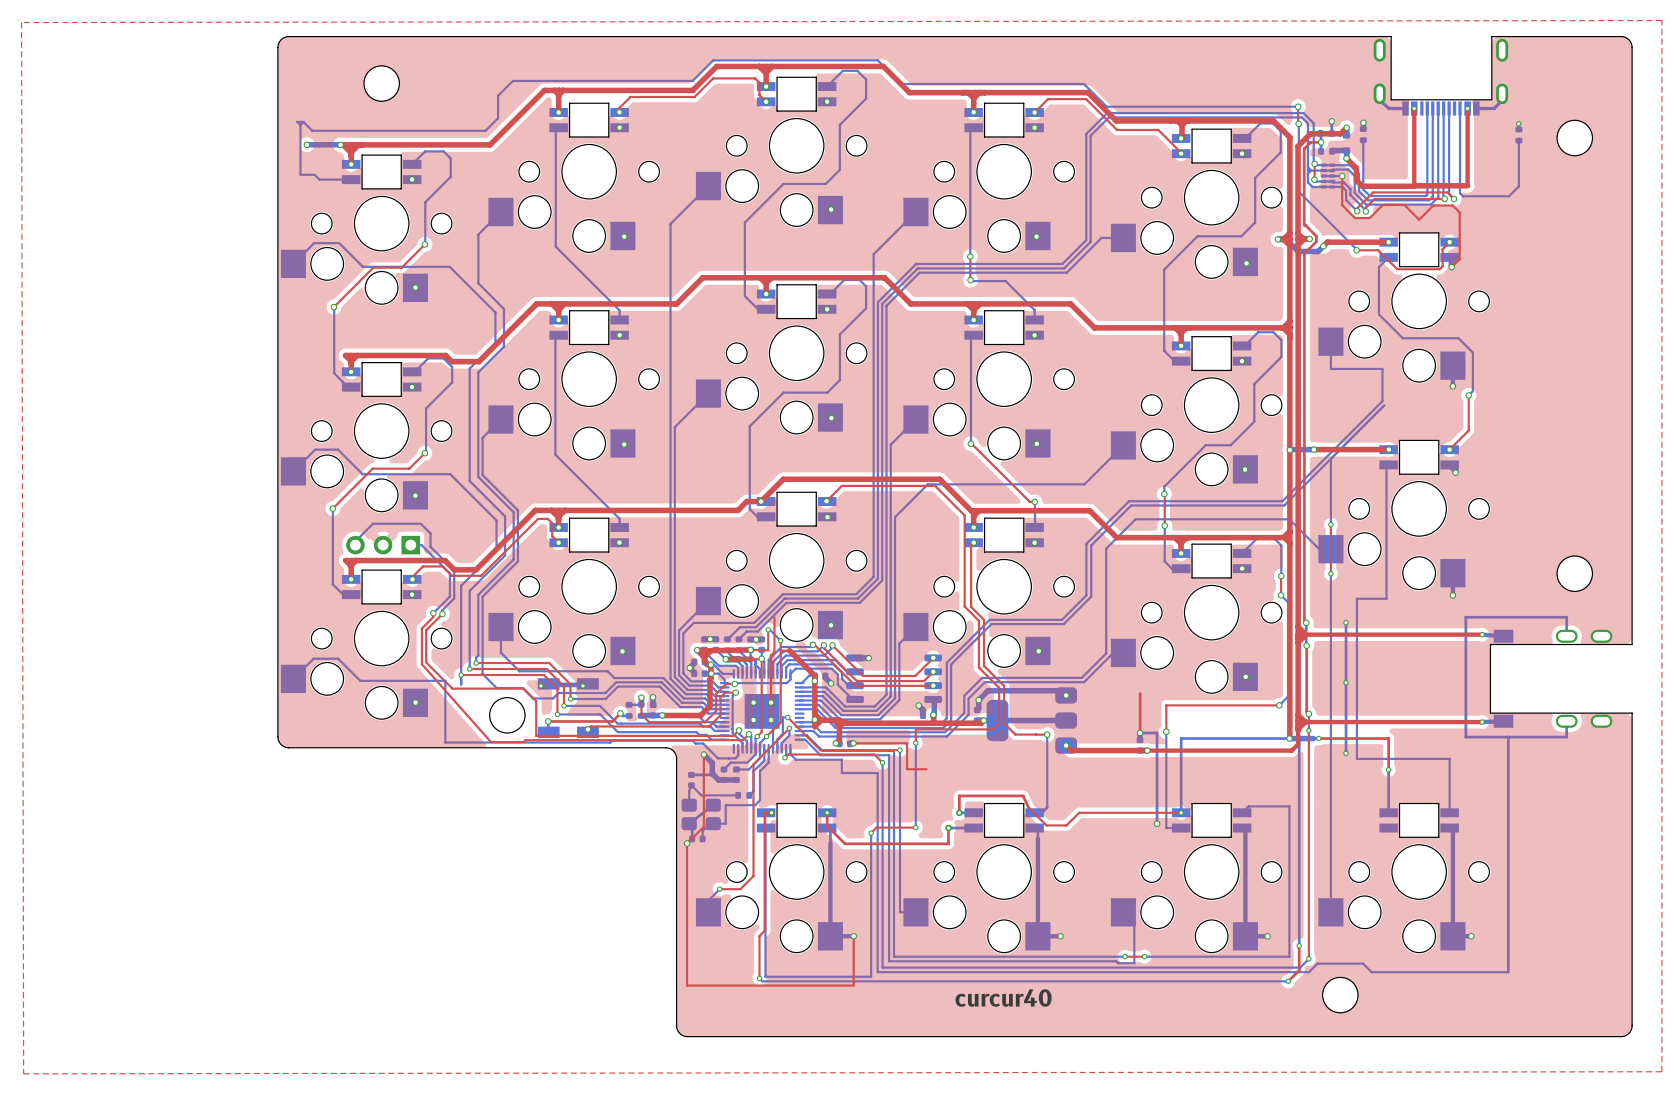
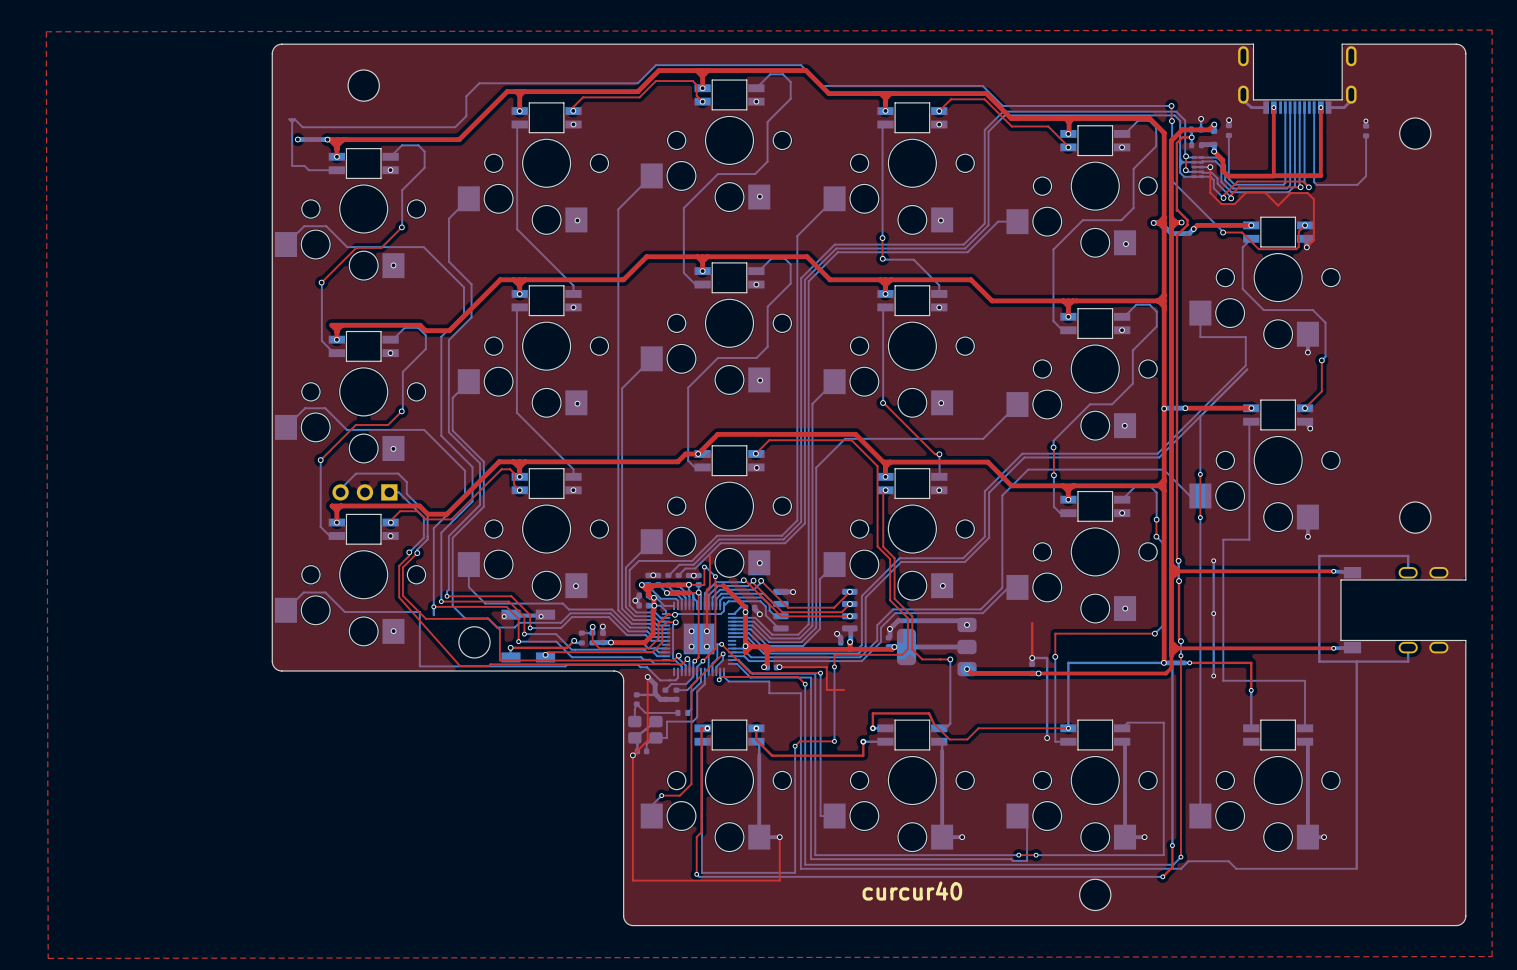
round board edge position: (1340, 995) -> (1095, 894)

